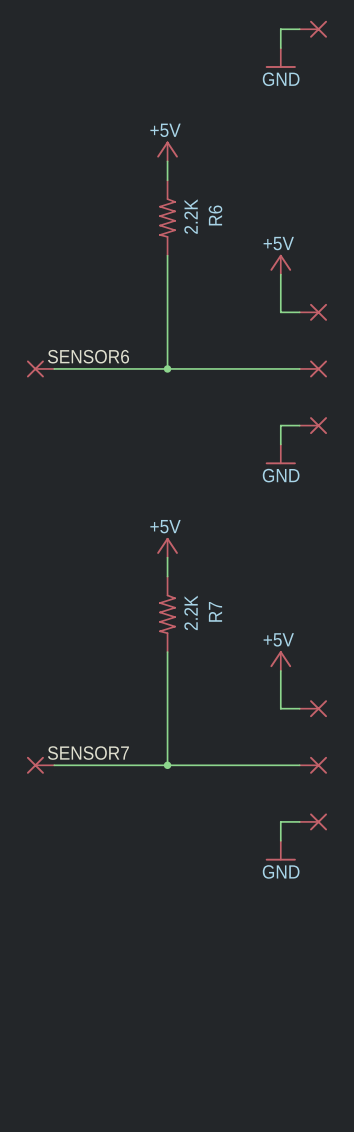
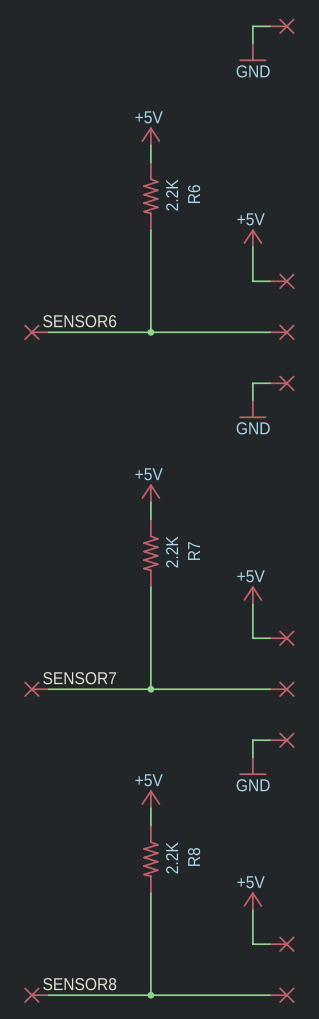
power symbol: none -> +5V (150, 799)
wire: none -> (150, 808) (150, 825)
R8: none -> 2.2K (150, 859)
wire: none -> (150, 893) (150, 995)
power symbol: none -> +5V (252, 901)
wire: none -> (252, 910) (252, 944) (269, 944)
part: none -> (282, 944)
label: none -> SENSOR8 (79, 984)
part: none -> (36, 995)
wire: none -> (48, 995) (269, 995)
junction: none -> (150, 995)
part: none -> (282, 995)

